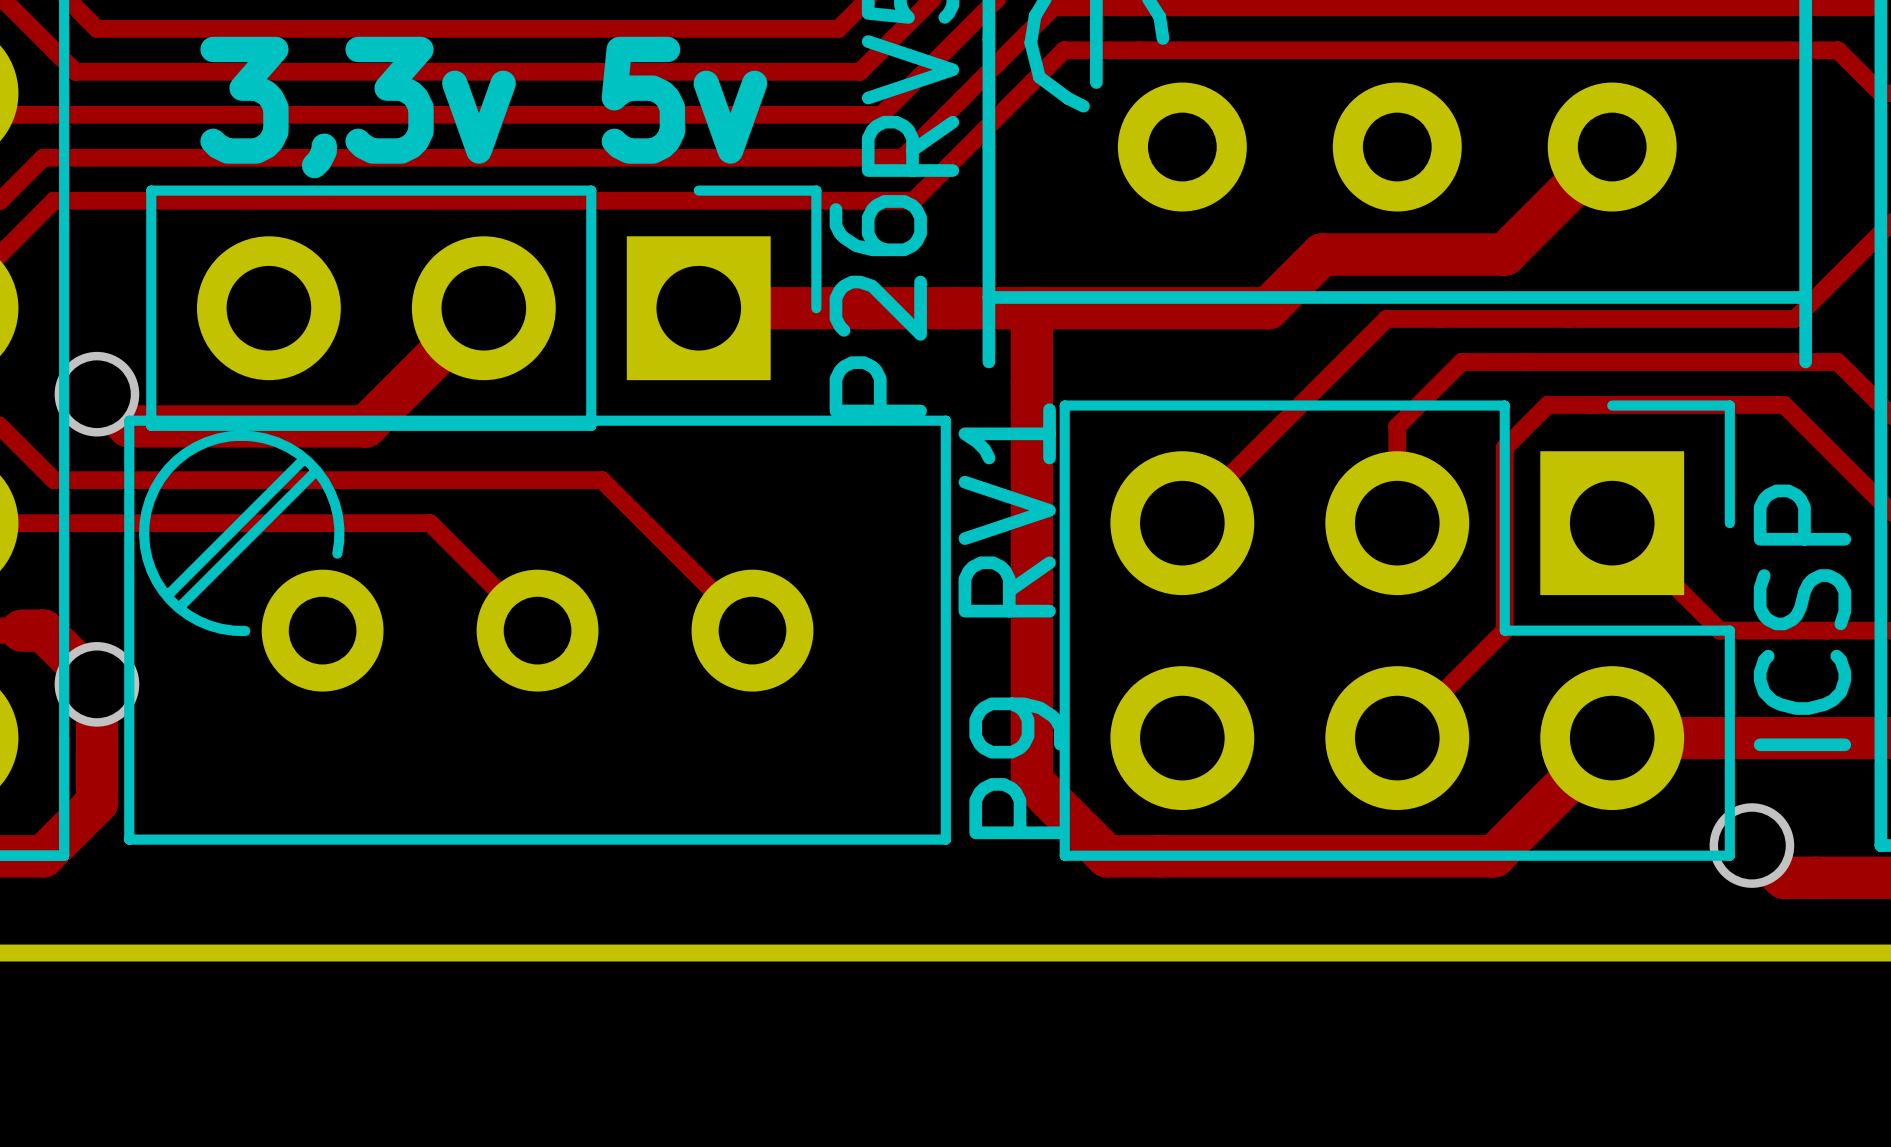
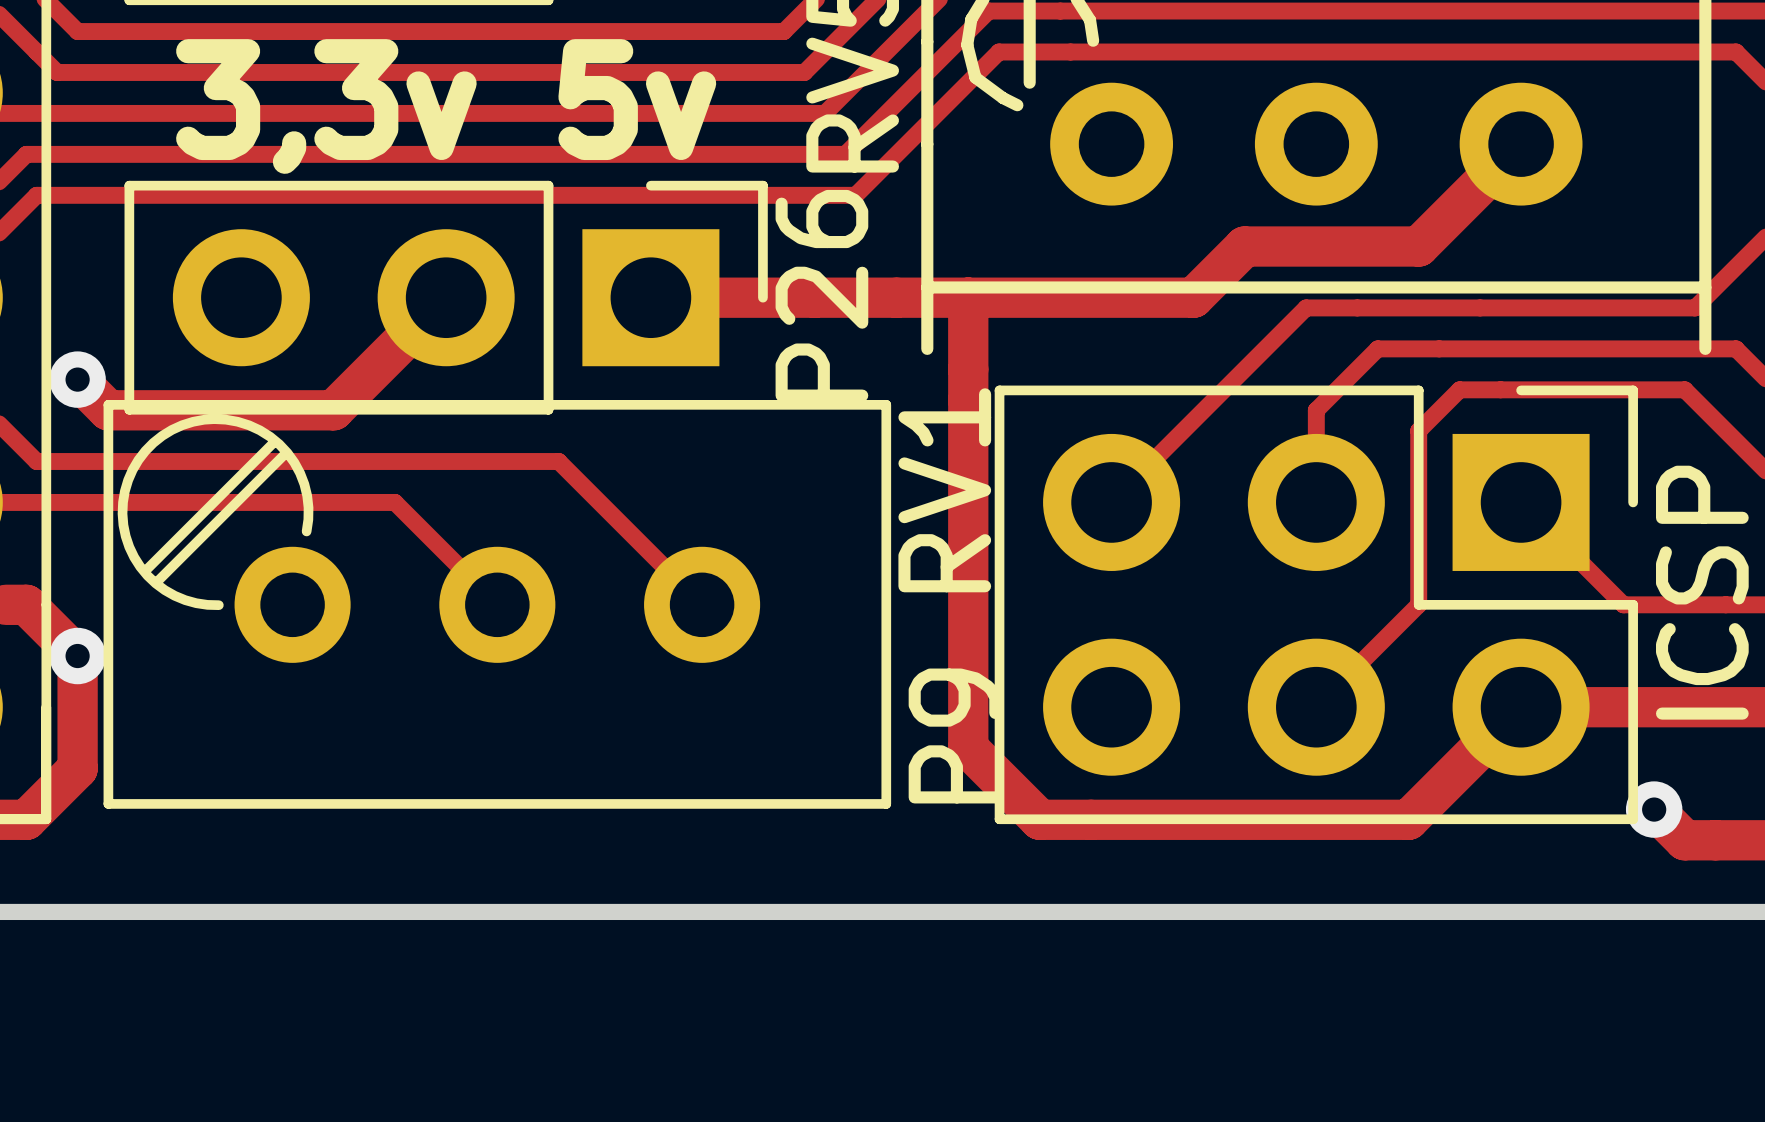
via size: [54, 351, 140, 437] -> [49, 351, 106, 408]
via size: [54, 642, 140, 727] -> [49, 627, 106, 685]
via size: [1709, 803, 1795, 888] -> [1625, 781, 1683, 838]

